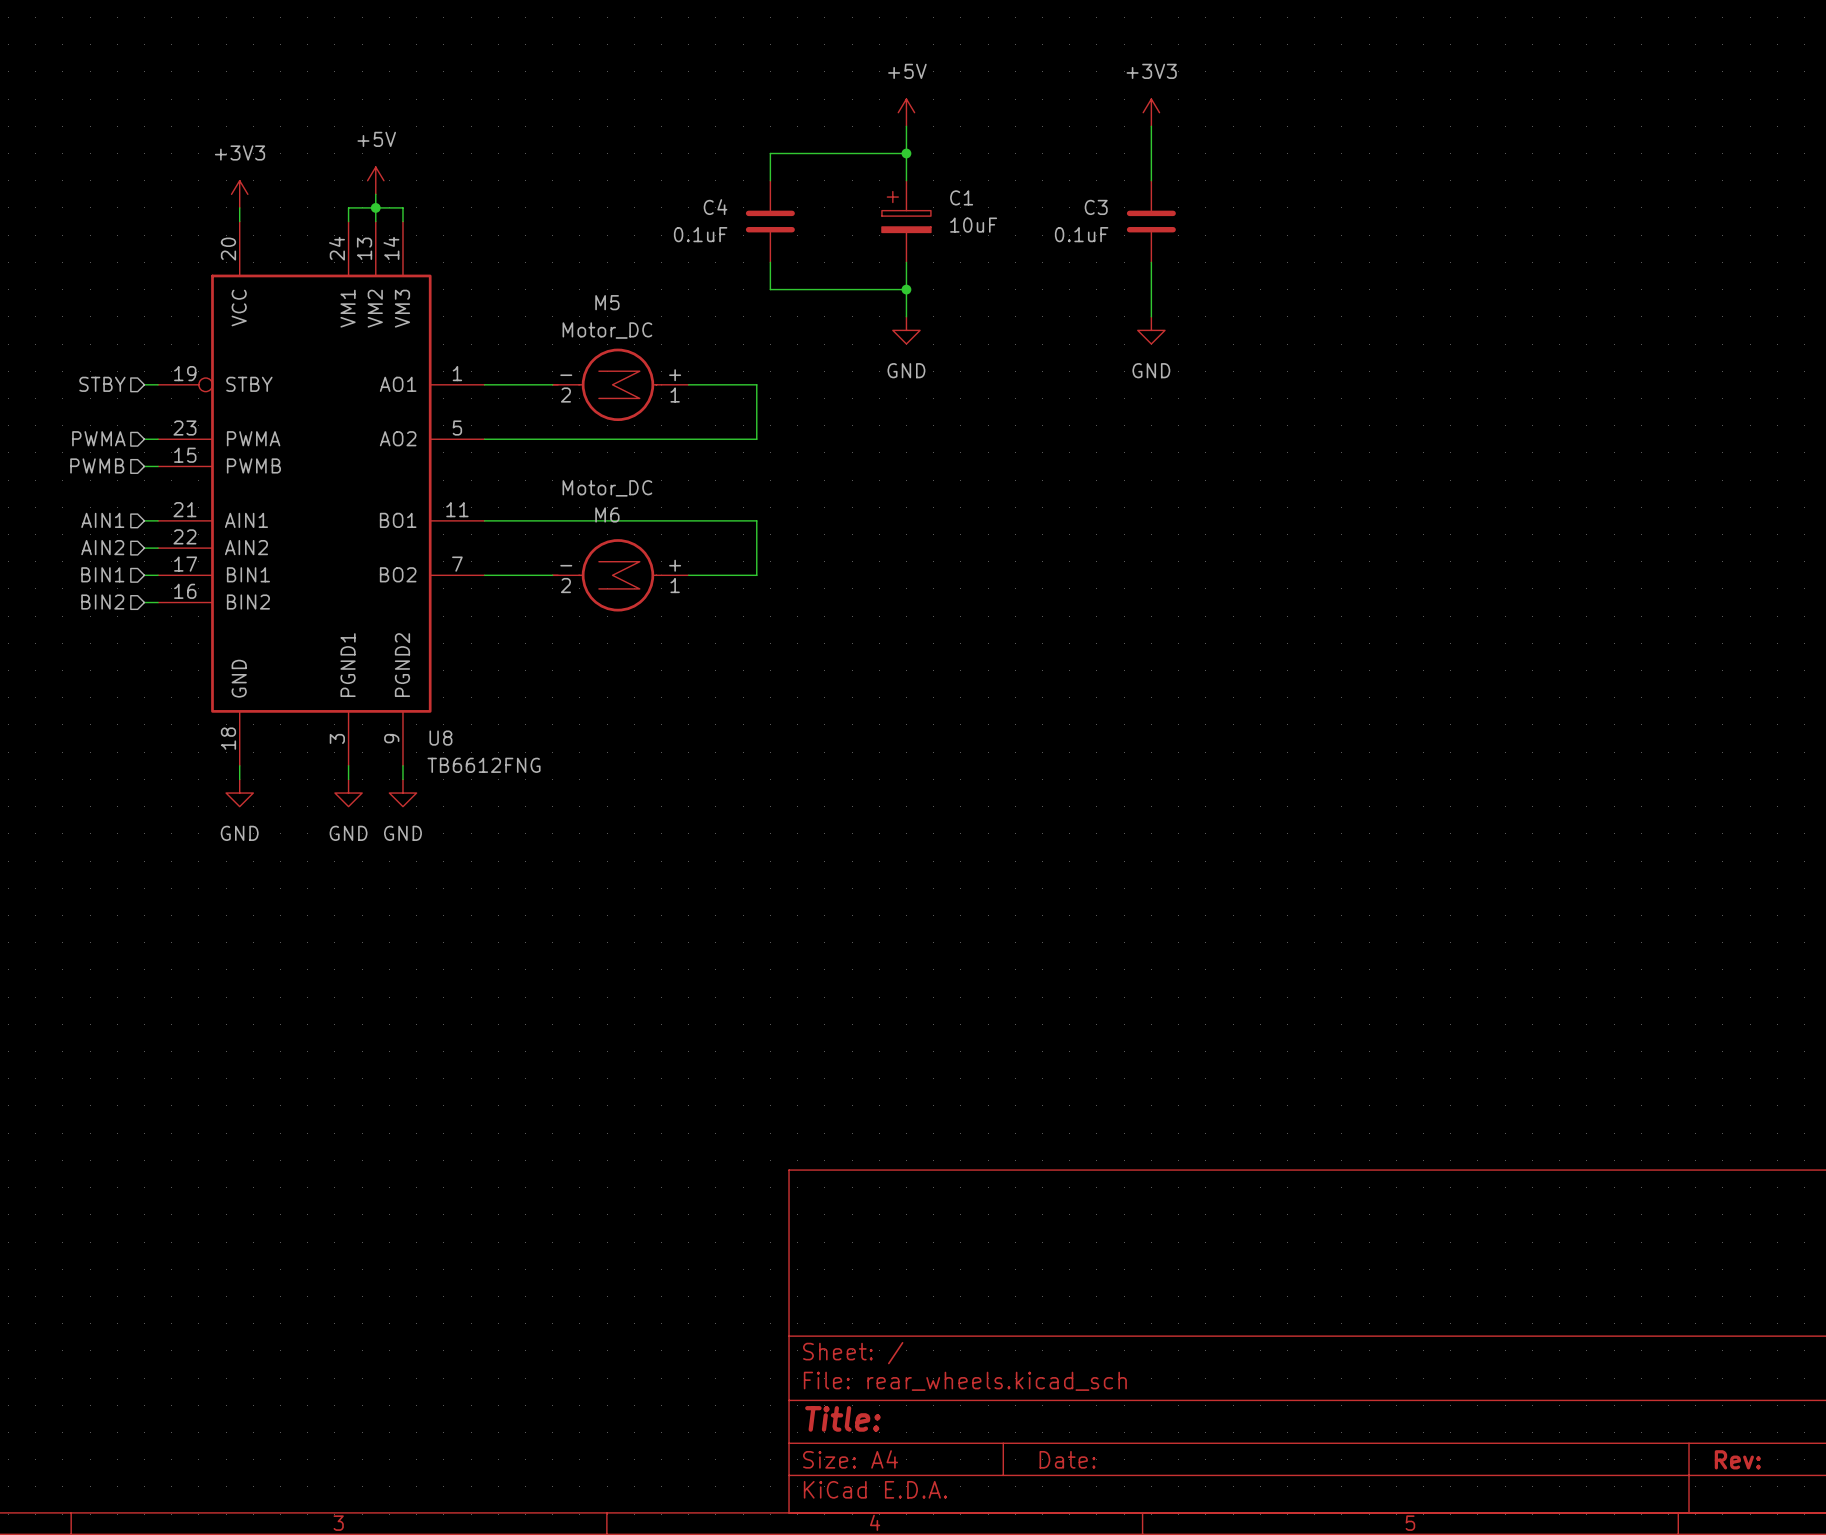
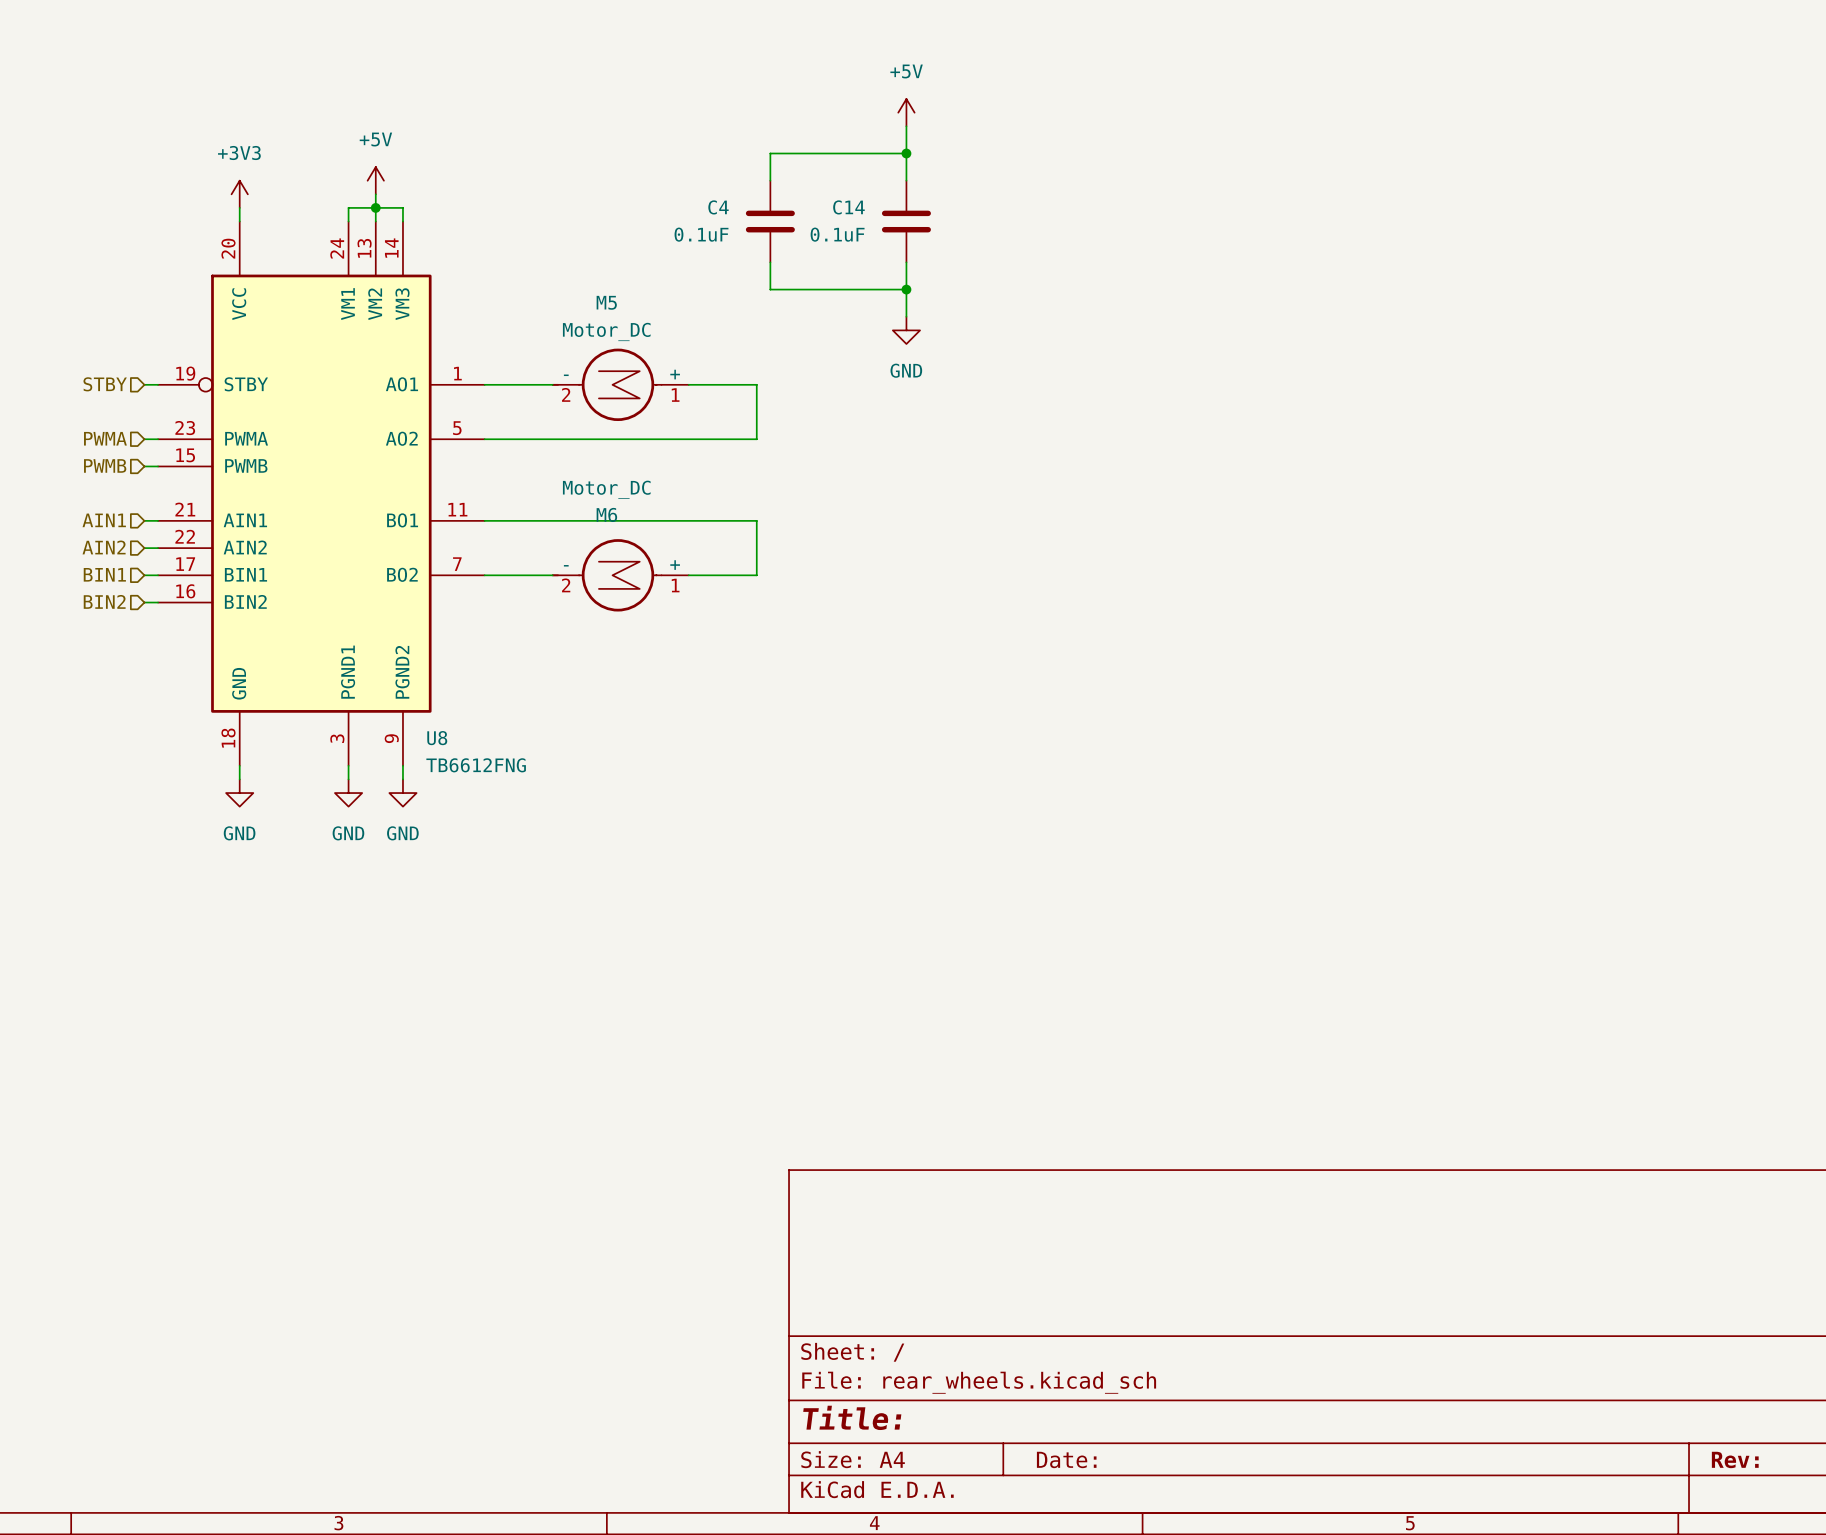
power symbol: +3V3 (1151, 112) -> none
wire: (1151, 126) (1151, 180) -> none
C1: 10uF (906, 221) -> none
C14: none -> 0.1uF (906, 221)
C3: 0.1uF (1151, 221) -> none
wire: (1151, 262) (1151, 316) -> none
power symbol: GND (1151, 330) -> none

